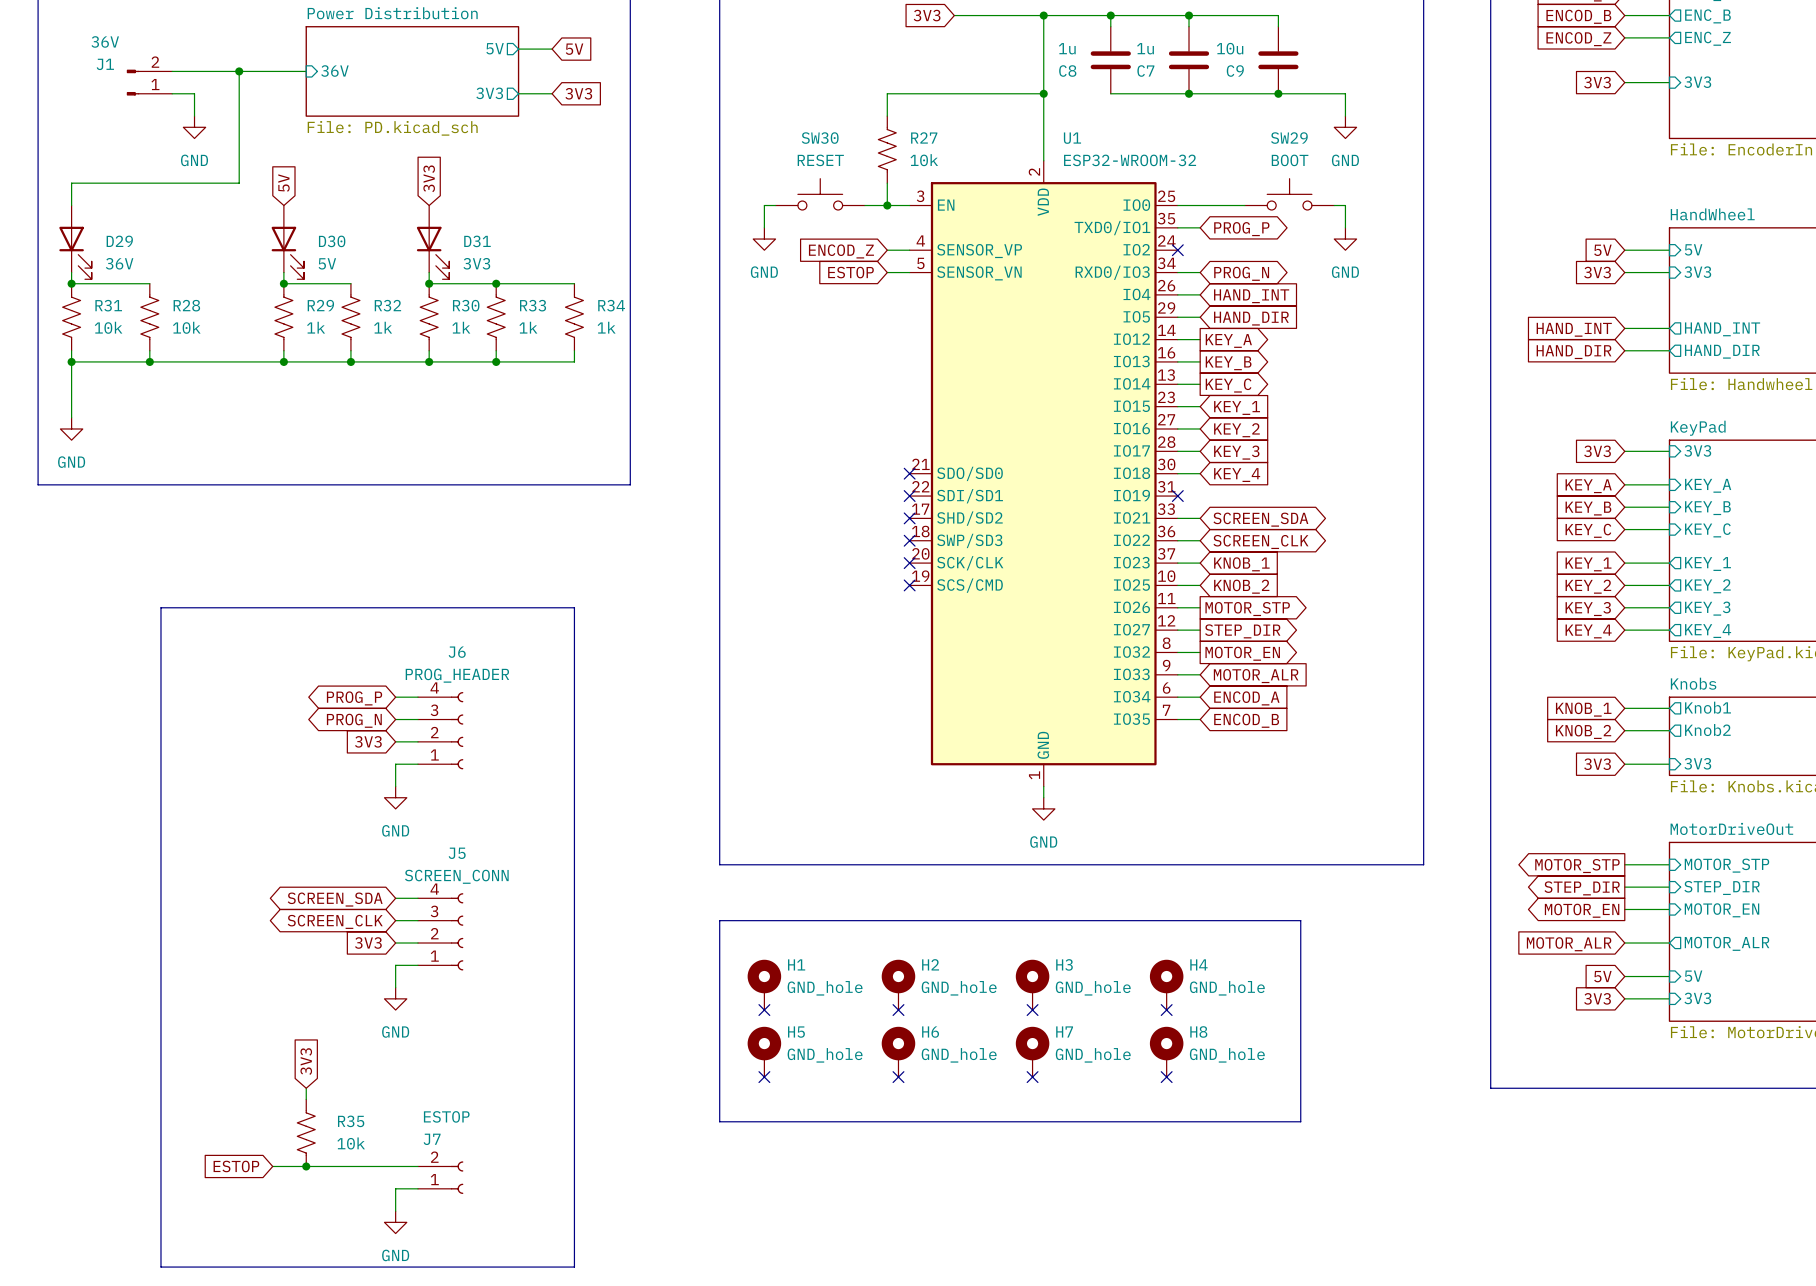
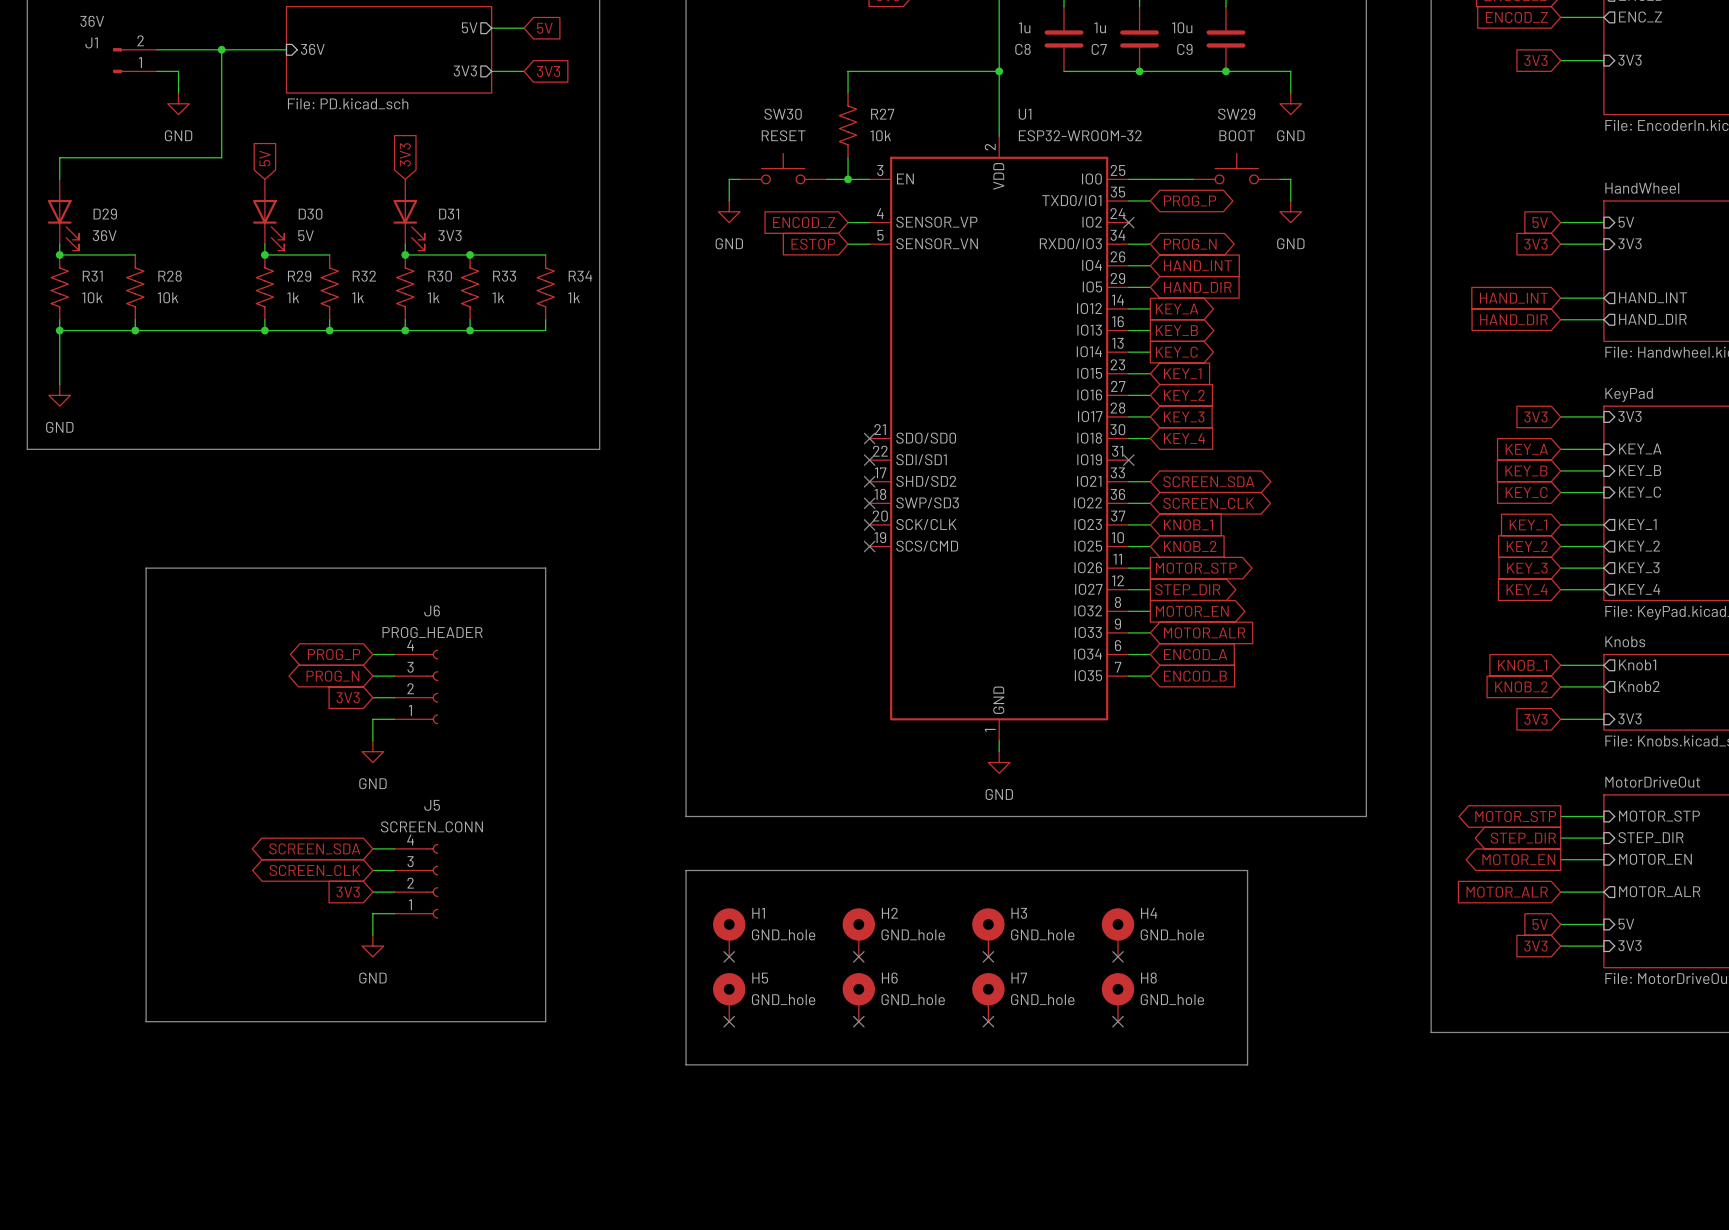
global label: 3V3 (306, 1061) -> none
line: (160, 1077) (160, 1267) (574, 1267) (574, 1077) -> (146, 1021) (545, 1021)
wire: (306, 1088) (306, 1099) -> none
R35: 10k (306, 1132) -> none
global label: ESTOP (236, 1166) -> none
wire: (272, 1166) (417, 1166) -> none
junction: (306, 1166) -> none
J7: ESTOP (440, 1177) -> none
wire: (417, 1188) (395, 1188) (395, 1211) -> none
power symbol: GND (395, 1222) -> none

